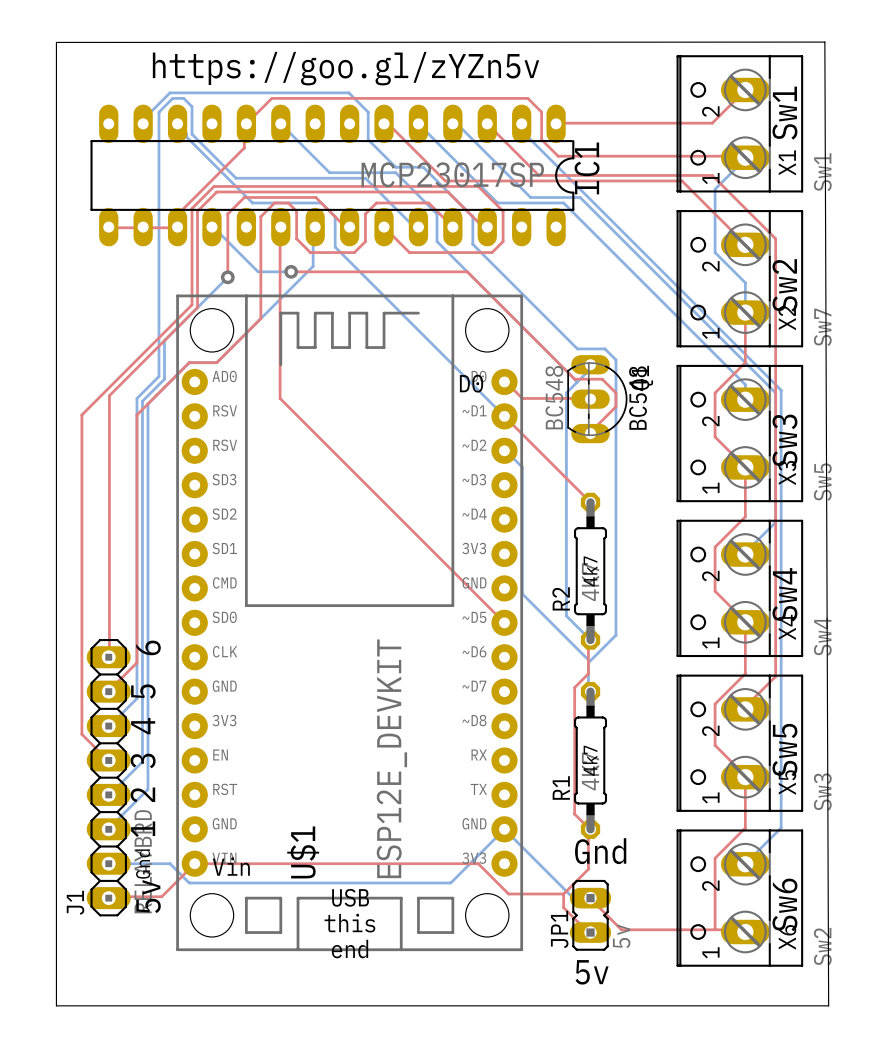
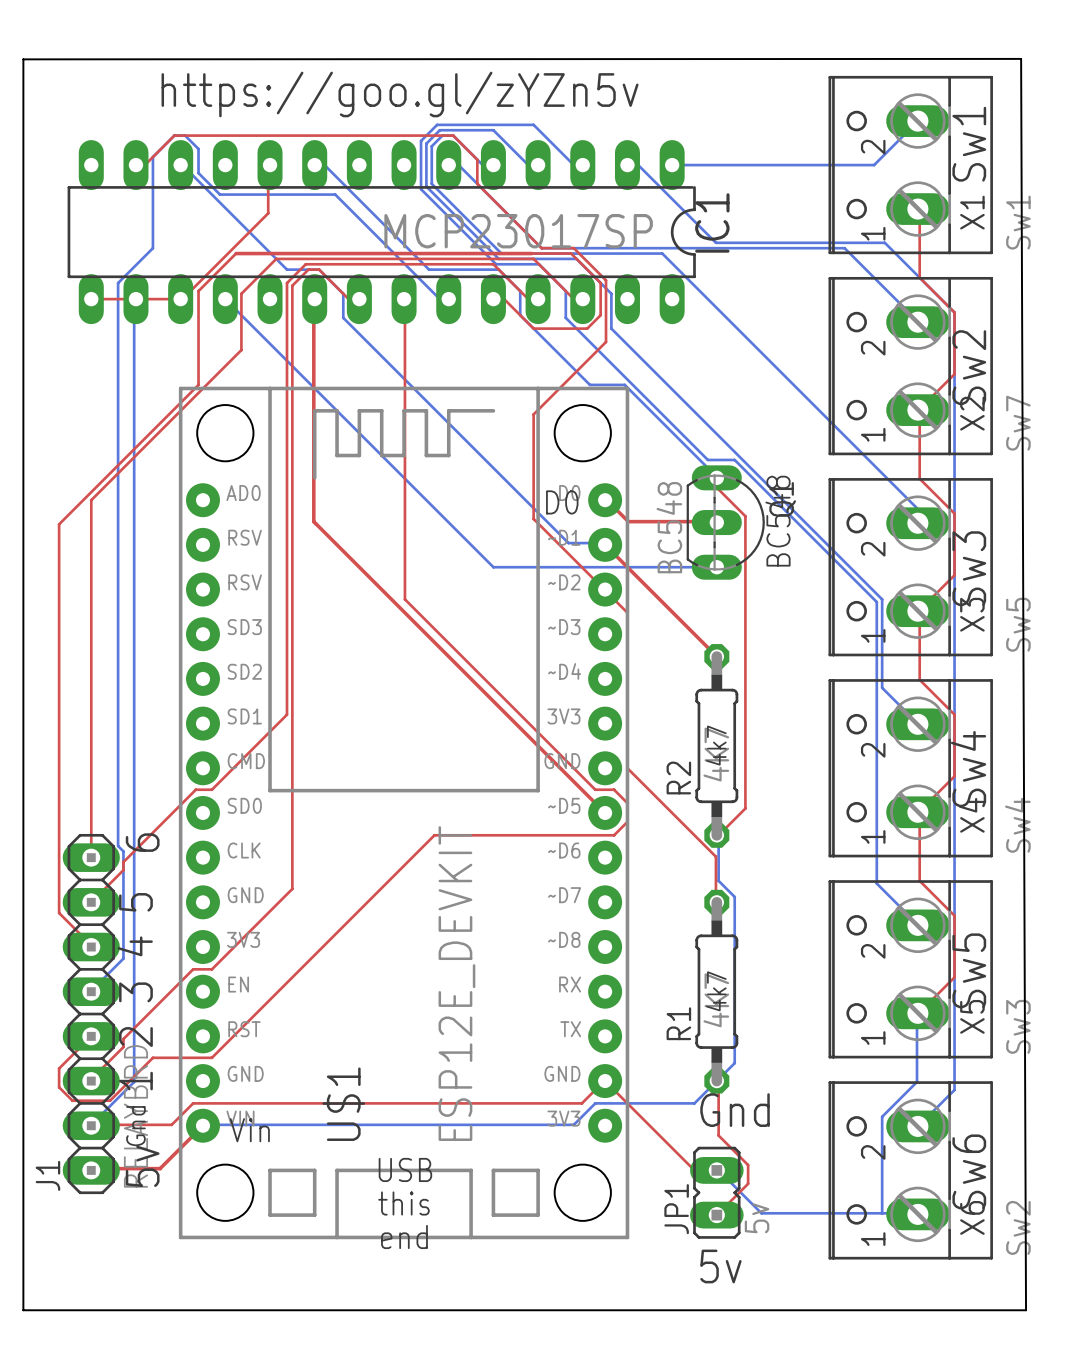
bottom track: none -> (917, 121) (874, 165) (672, 165)
top track: (745, 90) (712, 123) (556, 123) -> none
top track: none -> (135, 165) (144, 165) (174, 135) (453, 135) (477, 159) (477, 183) (541, 248) (573, 248) (606, 280) (606, 342) (533, 414) (533, 518) (627, 612) (627, 768) (715, 856) (716, 902)
bottom track: (143, 123) (145, 123) (145, 117) (169, 92) (348, 92) (368, 112) (368, 139) (395, 167) (423, 167) (472, 216) (472, 244) (577, 348) (604, 348) (615, 359) (615, 635) (588, 662) -> none
bottom track: (177, 123) (186, 134) (186, 136) (252, 203) (321, 203) (335, 216) (335, 247) (503, 414) -> (180, 165) (286, 269) (319, 269) (343, 293) (343, 317) (568, 543) (603, 543)
bottom track: (280, 123) (329, 172) (395, 172) (437, 214) (437, 241) (577, 381) -> (314, 165) (324, 165) (429, 269) (498, 269) (520, 291) (520, 315) (589, 384) (624, 384) (716, 477)
top track: (384, 123) (384, 125) (390, 125) (445, 180) (682, 180) (745, 244) -> none
bottom track: none -> (448, 165) (458, 165) (541, 248) (844, 248) (917, 322)
bottom track: (418, 123) (497, 203) (563, 203) (745, 384) (745, 399) -> (493, 165) (482, 165) (453, 135) (442, 135) (431, 146) (431, 183) (501, 253) (662, 253) (917, 508) (917, 523)
bottom track: (452, 123) (453, 125) (459, 125) (530, 197) (580, 197) (775, 392) (775, 522) (745, 554) -> (538, 165) (528, 165) (493, 130) (439, 130) (426, 143) (426, 186) (498, 258) (576, 258) (611, 293) (611, 328) (882, 599) (882, 687) (917, 724)
top track: (487, 123) (538, 175) (712, 175) (775, 238) (775, 676) (745, 706) (745, 709) -> none
bottom track: none -> (582, 165) (573, 165) (533, 124) (437, 124) (421, 140) (421, 189) (496, 264) (539, 264) (565, 291) (565, 317) (707, 459) (734, 459) (876, 602) (876, 883) (917, 925)
bottom track: (521, 123) (522, 131) (781, 390) (781, 827) (745, 864) -> (627, 165) (638, 165) (715, 242) (884, 242) (954, 312) (954, 1089) (917, 1126)
top track: (745, 157) (745, 156) (558, 156) (541, 139) (541, 112) (527, 98) (271, 98) (244, 125) (244, 147) (178, 214) (177, 227) (108, 227) -> (270, 165) (268, 165) (268, 213) (182, 299) (91, 299)
top track: none -> (917, 209) (919, 210) (919, 277) (954, 312) (954, 374) (917, 410) (919, 411) (919, 478) (954, 513) (954, 575) (917, 611) (919, 612) (919, 679) (954, 714) (954, 776) (917, 812) (919, 813) (919, 880) (954, 915) (954, 977) (917, 1013)
bottom track: (745, 157) (715, 189) (715, 252) (745, 282) (745, 312) -> none
top track: (220, 191) (216, 191) (197, 211) (197, 307) (109, 395) (108, 657) -> (236, 253) (198, 291) (198, 384) (59, 524) (59, 913) (91, 947)
top track: (448, 191) (481, 225) (486, 225) (487, 227) -> (531, 253) (571, 253) (600, 283) (600, 315) (587, 328) (533, 328) (504, 299) (493, 299)
bottom track: none -> (135, 299) (134, 299) (134, 1081) (91, 1125)
bottom track: (211, 227) (258, 271) (291, 271) -> (225, 299) (493, 567) (716, 567)
top track: none -> (359, 299) (348, 299) (319, 269) (308, 269) (292, 285) (292, 888) (211, 969) (193, 969) (123, 1039) (123, 1047) (91, 1081)
bottom track: (315, 227) (313, 227) (313, 266) (216, 362) (189, 362) (147, 403) (147, 789) (108, 829) -> none
top track: (349, 227) (348, 225) (343, 225) (315, 197) (244, 197) (227, 214) (227, 277) -> (404, 299) (404, 599) (595, 789) (614, 789) (627, 803) (627, 821) (614, 835) (434, 835) (211, 1057) (152, 1057) (110, 1100) (72, 1100) (59, 1087) (59, 1068) (91, 1036)
top track: (384, 227) (409, 252) (492, 252) (503, 241) (503, 211) (478, 186) (214, 186) (192, 208) (192, 304) (81, 414) (81, 734) (108, 760) -> none
bottom track: none -> (448, 299) (439, 299) (335, 194) (219, 194) (198, 173) (198, 148) (185, 135) (174, 135) (152, 157) (152, 248) (118, 283) (118, 846) (123, 851) (123, 958) (91, 991)
bottom track: (418, 227) (417, 225) (412, 225) (365, 178) (236, 178) (192, 134) (192, 106) (183, 98) (172, 98) (158, 112) (158, 376) (136, 398) (136, 698) (108, 726) -> none
top track: (452, 227) (428, 203) (376, 203) (365, 214) (365, 241) (354, 252) (310, 252) (296, 238) (296, 211) (288, 203) (274, 203) (260, 216) (260, 318) (216, 362) (189, 362) (136, 414) (136, 662) (108, 691) -> (538, 299) (528, 299) (493, 264) (305, 264) (286, 283) (286, 714) (211, 789) (195, 789) (123, 862) (123, 870) (91, 902)
top track: none -> (582, 299) (573, 299) (533, 258) (276, 258) (241, 293) (241, 350) (91, 500) (91, 857)
top track: (291, 271) (467, 271) (574, 379) (602, 379) (615, 392) (615, 406) (590, 433) -> none
via: (291, 271) -> none
bottom track: (227, 277) (164, 340) (164, 379) (142, 401) (142, 761) (108, 794) -> none
via: (227, 277) -> none
top track: (745, 312) (745, 362) (715, 392) (715, 437) (745, 467) (745, 516) (715, 547) (715, 591) (745, 621) (745, 673) (715, 704) (715, 745) (745, 775) (745, 827) (715, 858) (715, 929) -> none
bottom track: (590, 364) (588, 365) (588, 370) (566, 392) (566, 615) (590, 640) -> (202, 1125) (573, 1124) (595, 1103) (694, 1103) (734, 1063) (734, 896) (718, 880) (718, 835) (716, 835)
bottom track: (504, 450) (522, 467) (522, 593) (588, 660) (588, 690) (590, 691) -> none
top track: (590, 640) (588, 640) (588, 673) (574, 687) (574, 814) (590, 829) (588, 830) (588, 869) (563, 894) -> (716, 835) (745, 808) (745, 516) (718, 489) (718, 478) (716, 477)
bottom track: none -> (917, 1013) (917, 1081) (882, 1116) (882, 1213)
bottom track: (108, 863) (169, 863) (189, 882) (450, 882) (504, 829) (571, 896) (590, 898) -> (917, 1214) (761, 1213) (716, 1170)
top track: (194, 863) (478, 863) (508, 894) (563, 894) -> none
top track: (563, 894) (563, 907) (590, 932) -> (716, 1081) (718, 1081) (718, 1135) (748, 1165) (748, 1183) (716, 1215)
top track: (590, 898) (621, 929) (745, 929) (745, 932) -> (716, 1170) (694, 1170) (605, 1081) (581, 1103) (193, 1103) (171, 1124) (91, 1125)

